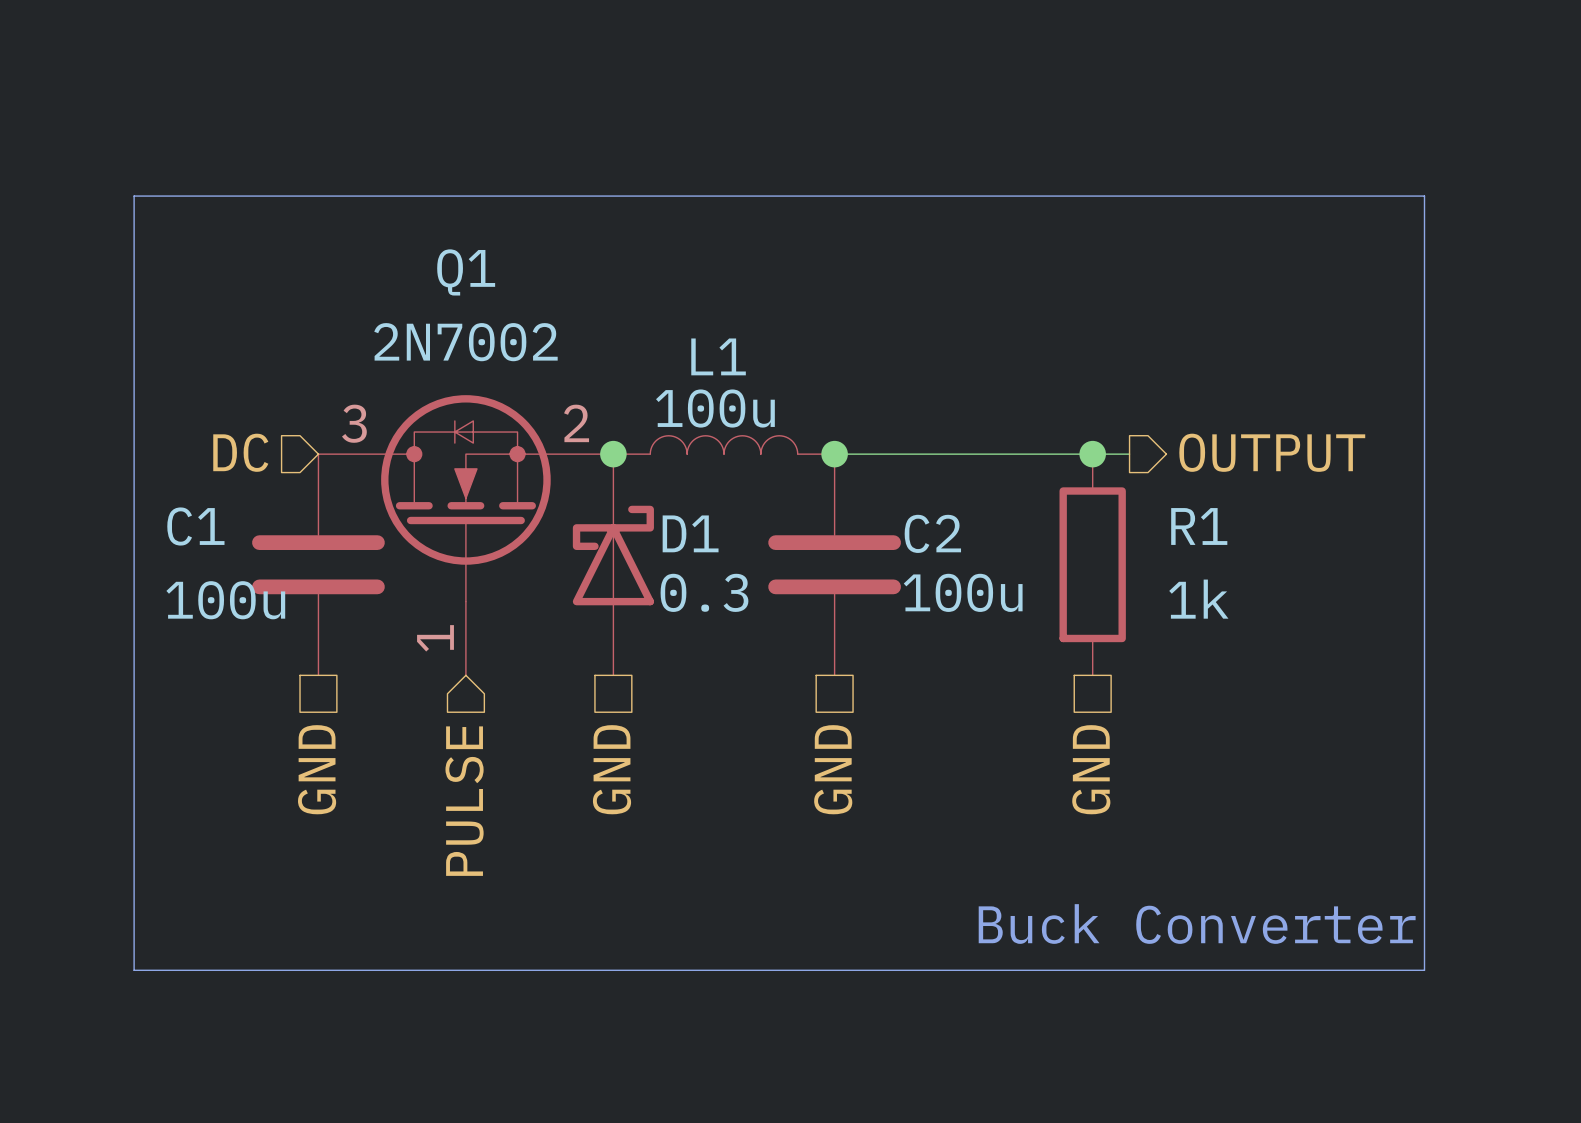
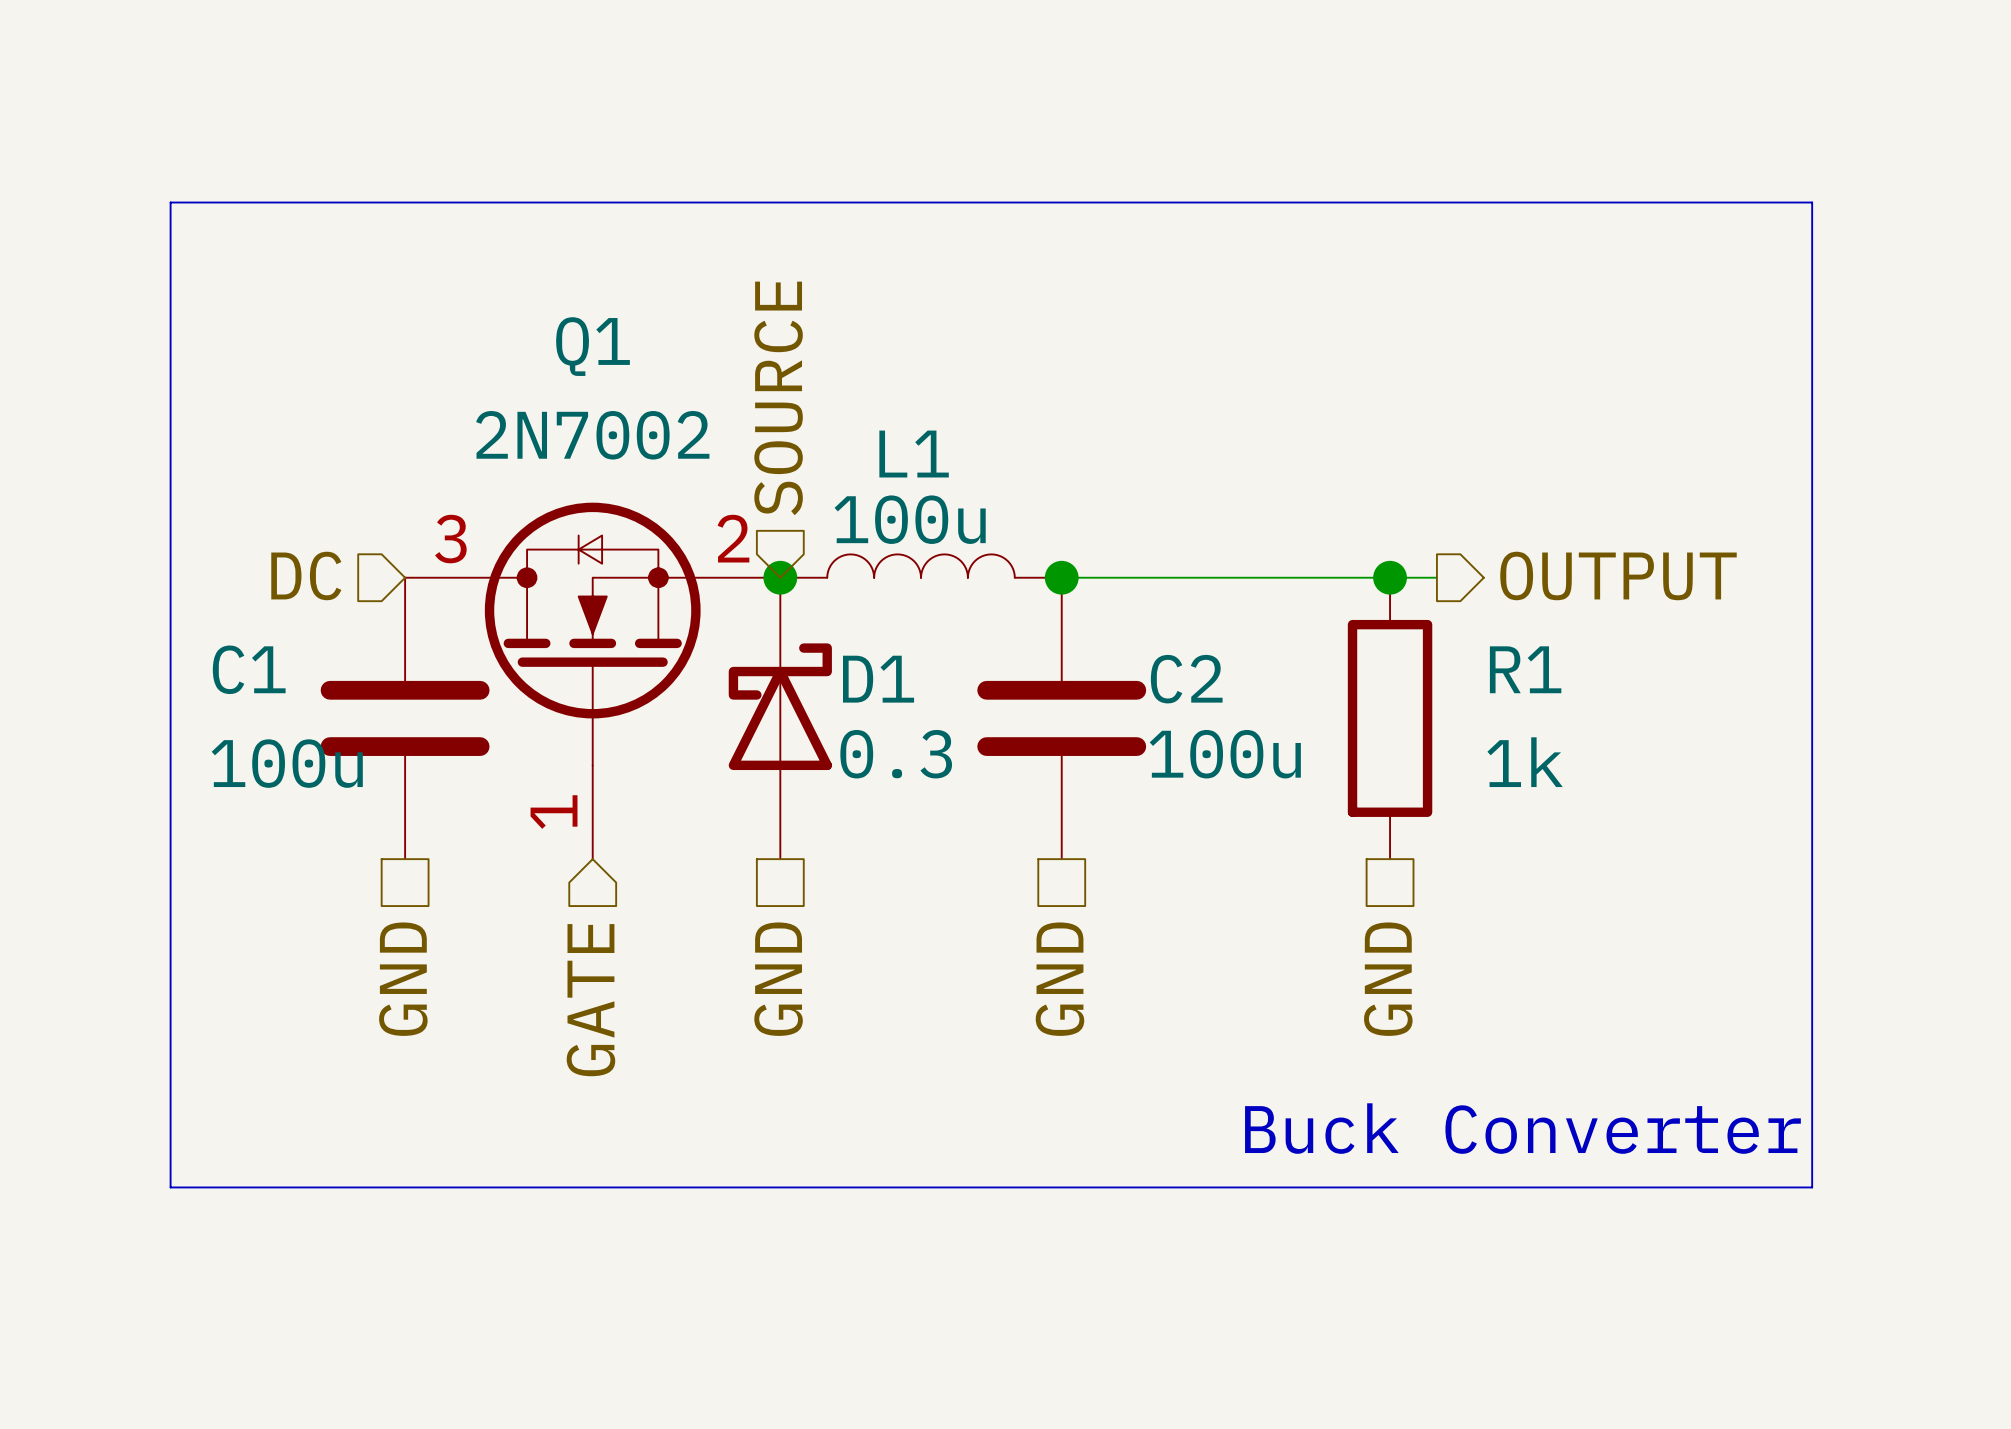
line: (134, 196) (1424, 196) -> (170, 249) (170, 202) (1812, 202) (1812, 249)
hierarchical label: none -> SOURCE (778, 398)
hierarchical label: PULSE (464, 801) -> GATE (590, 1000)
text position: Buck Converter (1197, 924) -> Buck Converter (1522, 1128)
line: (134, 933) (134, 970) (1424, 970) (1424, 933) -> (170, 1187) (1812, 1187)

